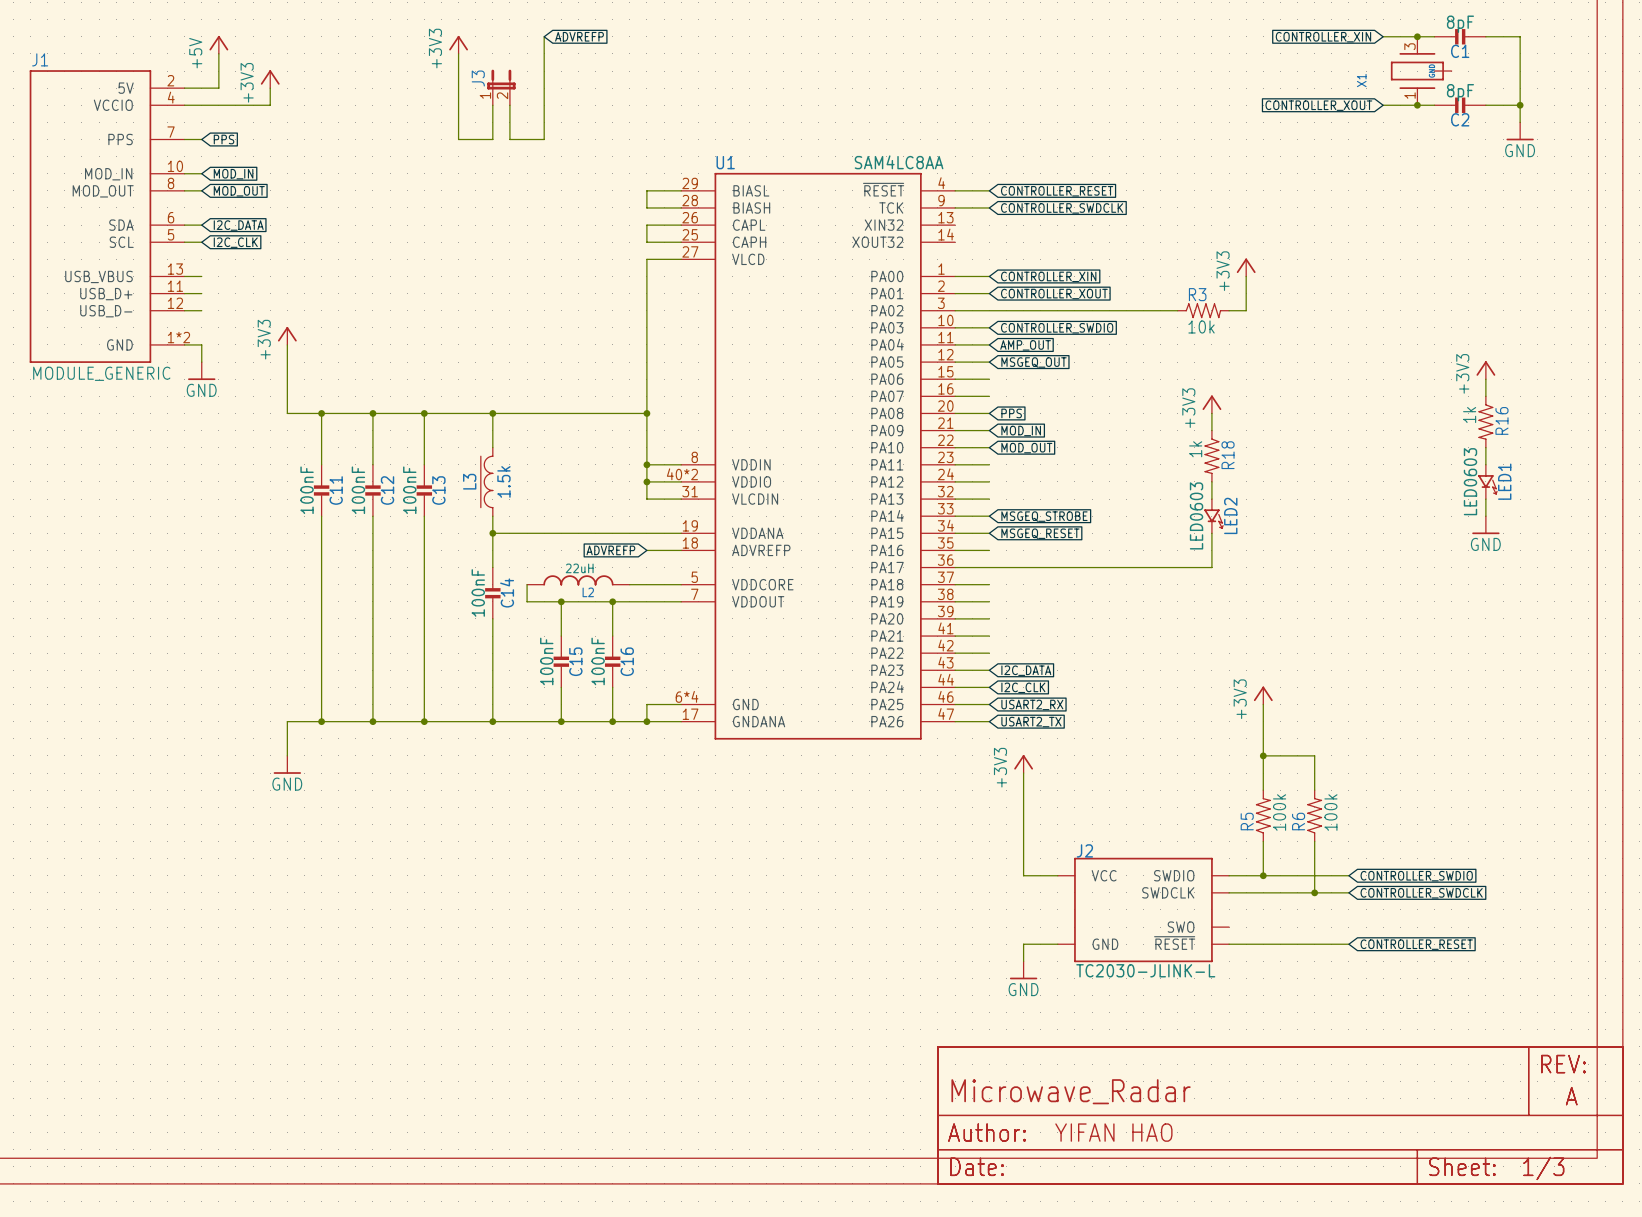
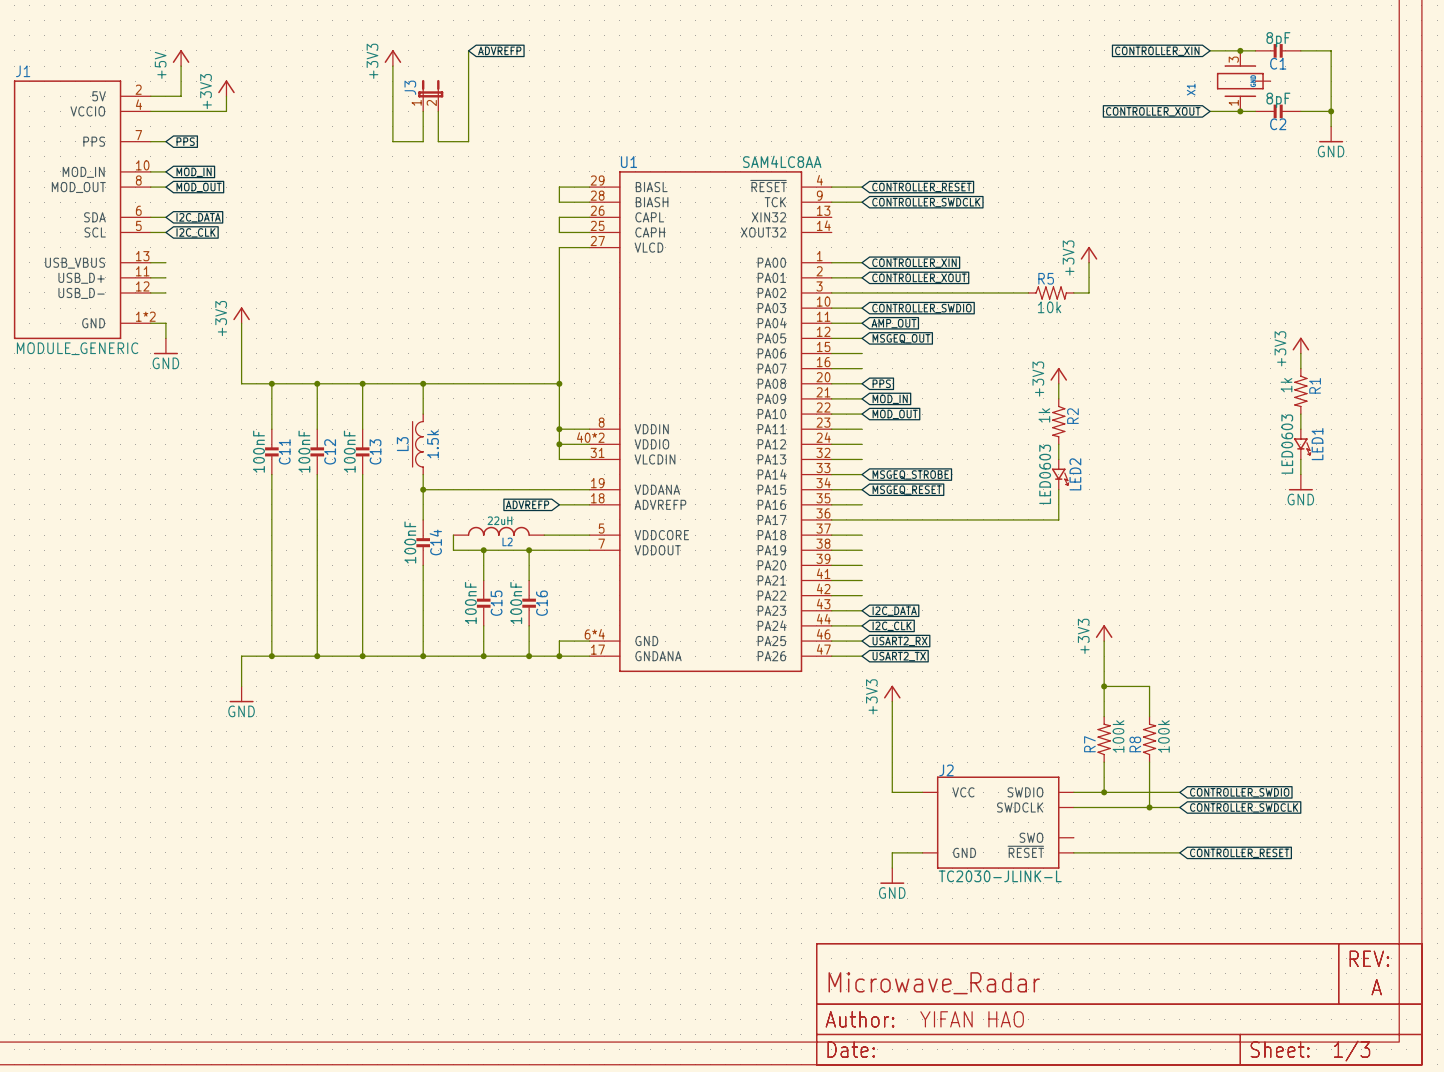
R3 name: R3 (1197, 294) -> R5 (1046, 278)
R16 name: R16 (1501, 420) -> R1 (1315, 385)
R18 name: R18 (1228, 455) -> R2 (1072, 416)
R5 name: R5 (1247, 821) -> R7 (1089, 744)
R6 name: R6 (1298, 821) -> R8 (1135, 744)

